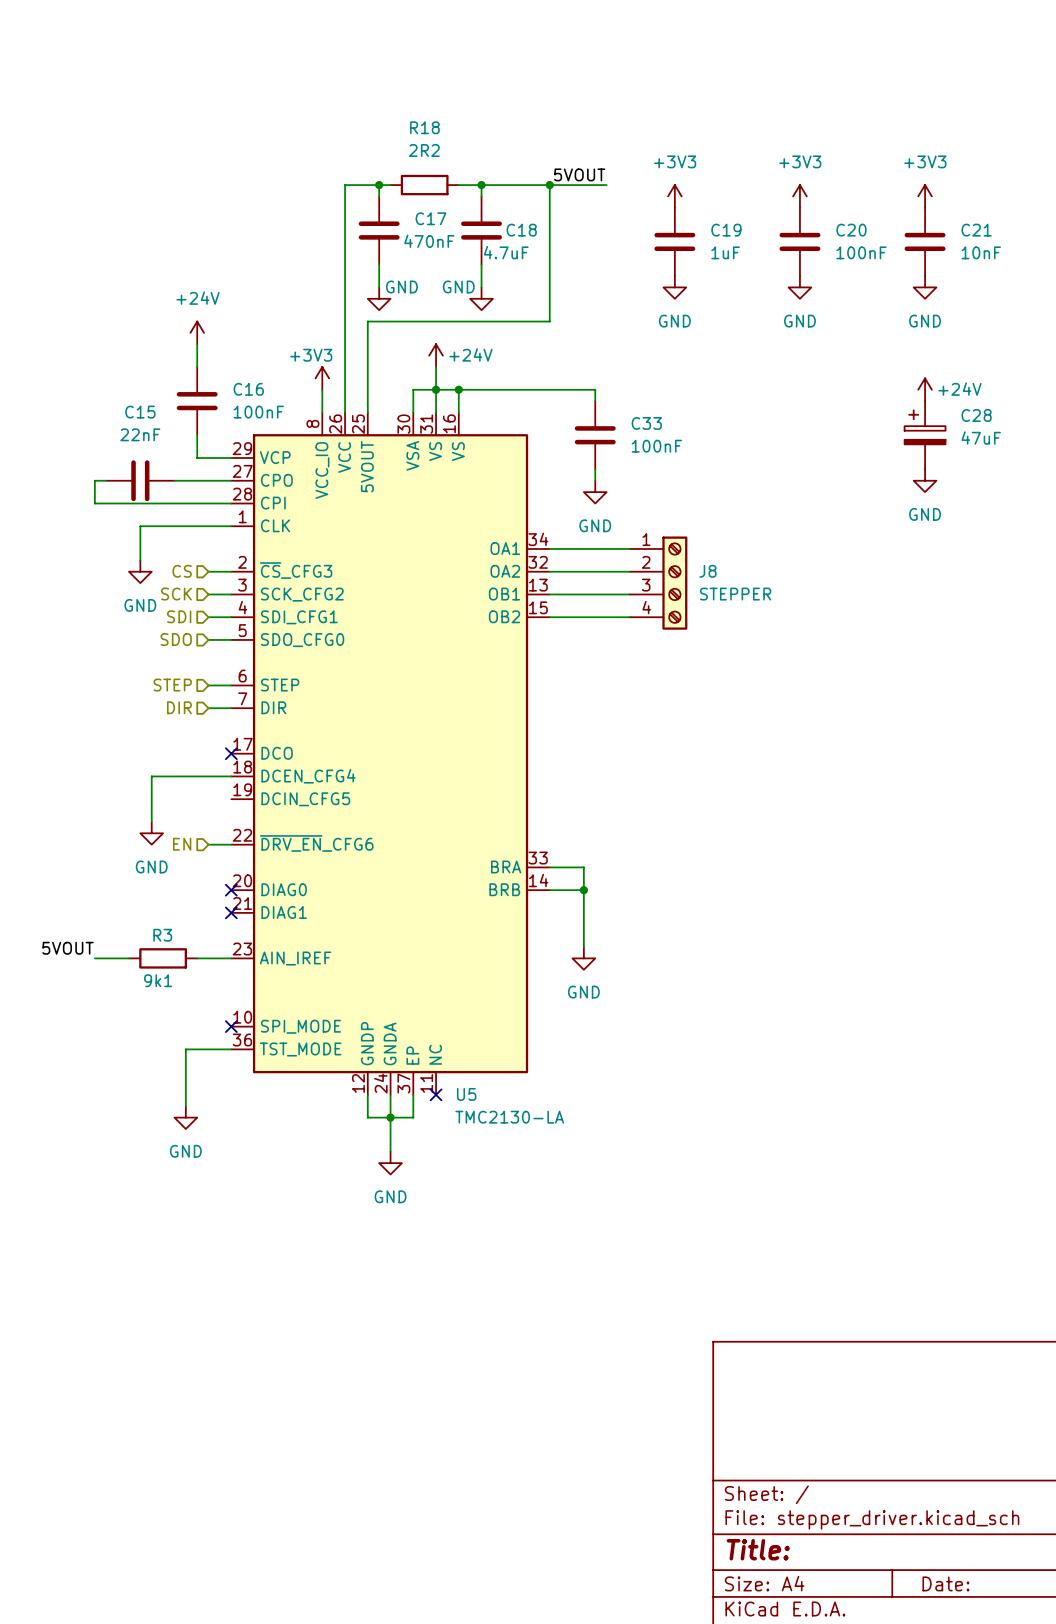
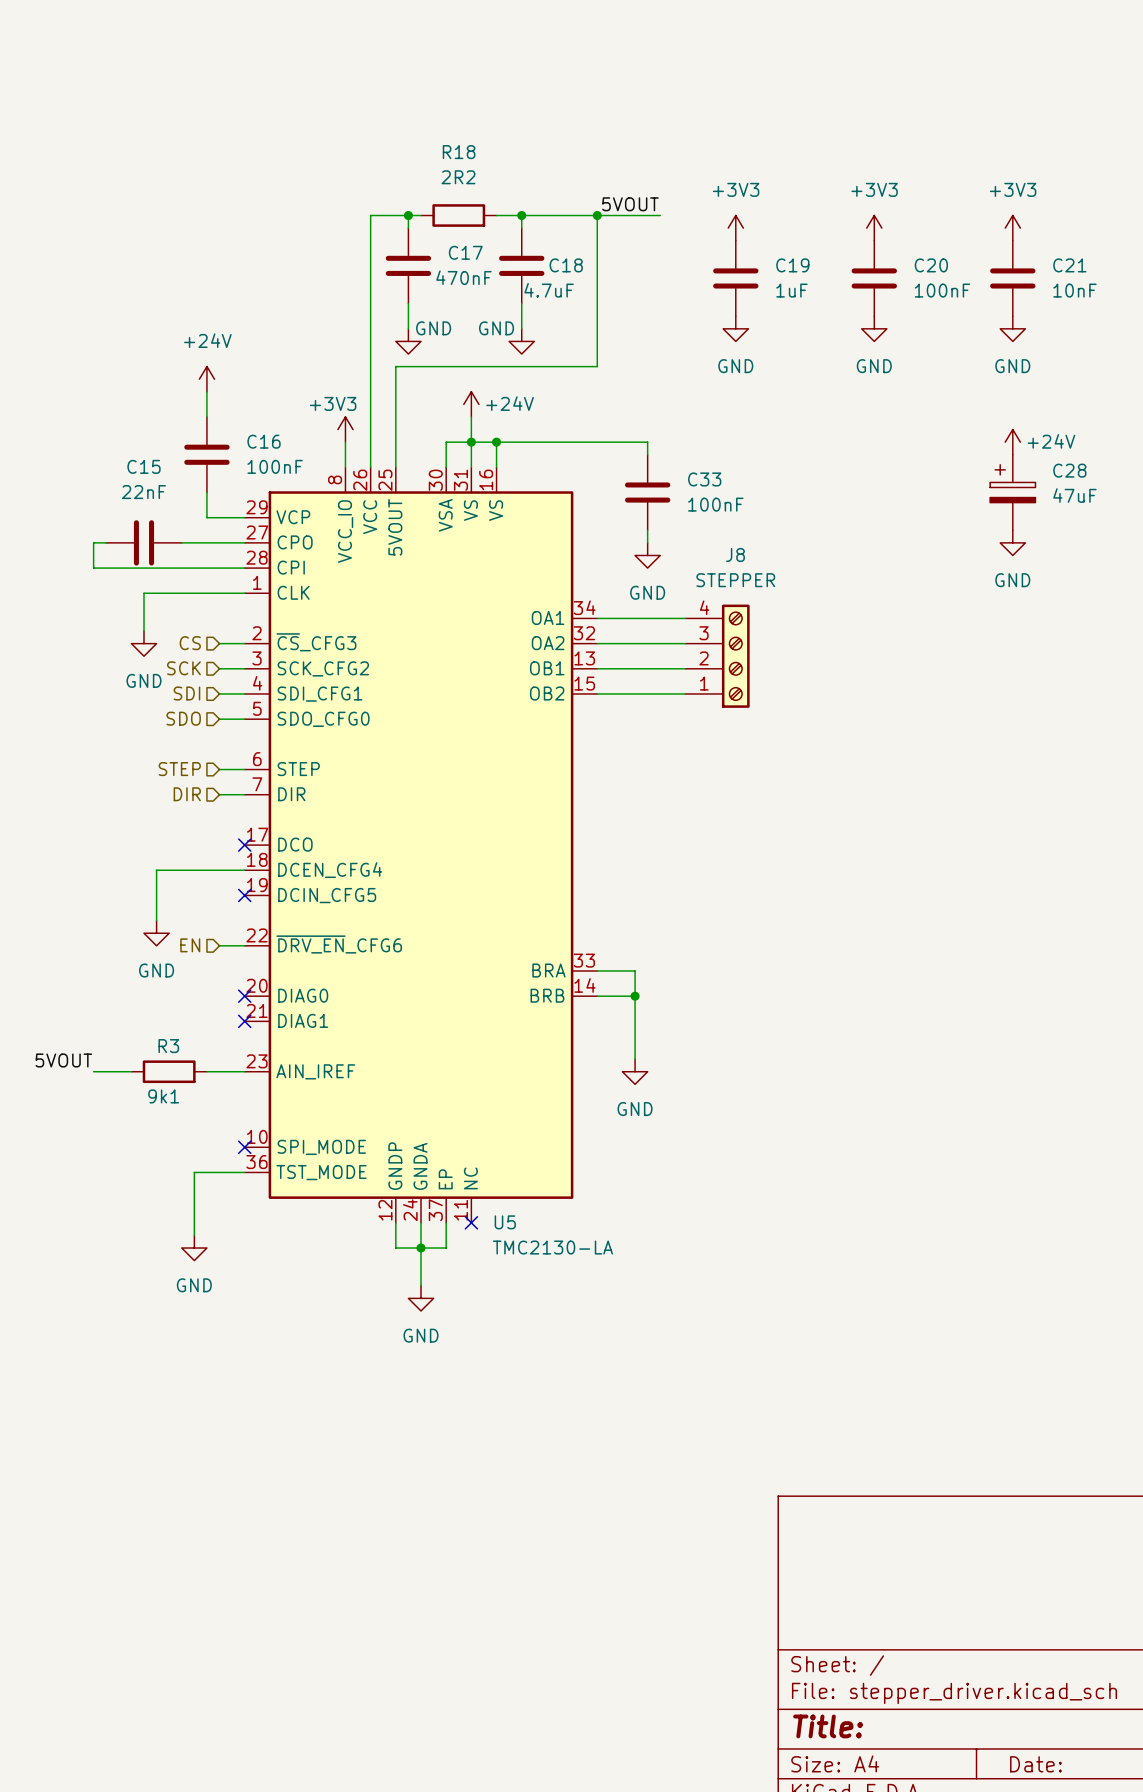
J8 name position: J8 (707, 571) -> J8 (735, 555)
J8 flip: as is (674, 583) -> up-down (735, 656)
J8 value position: STEPPER (735, 594) -> STEPPER (735, 580)
no-connect mark: none -> (244, 895)

